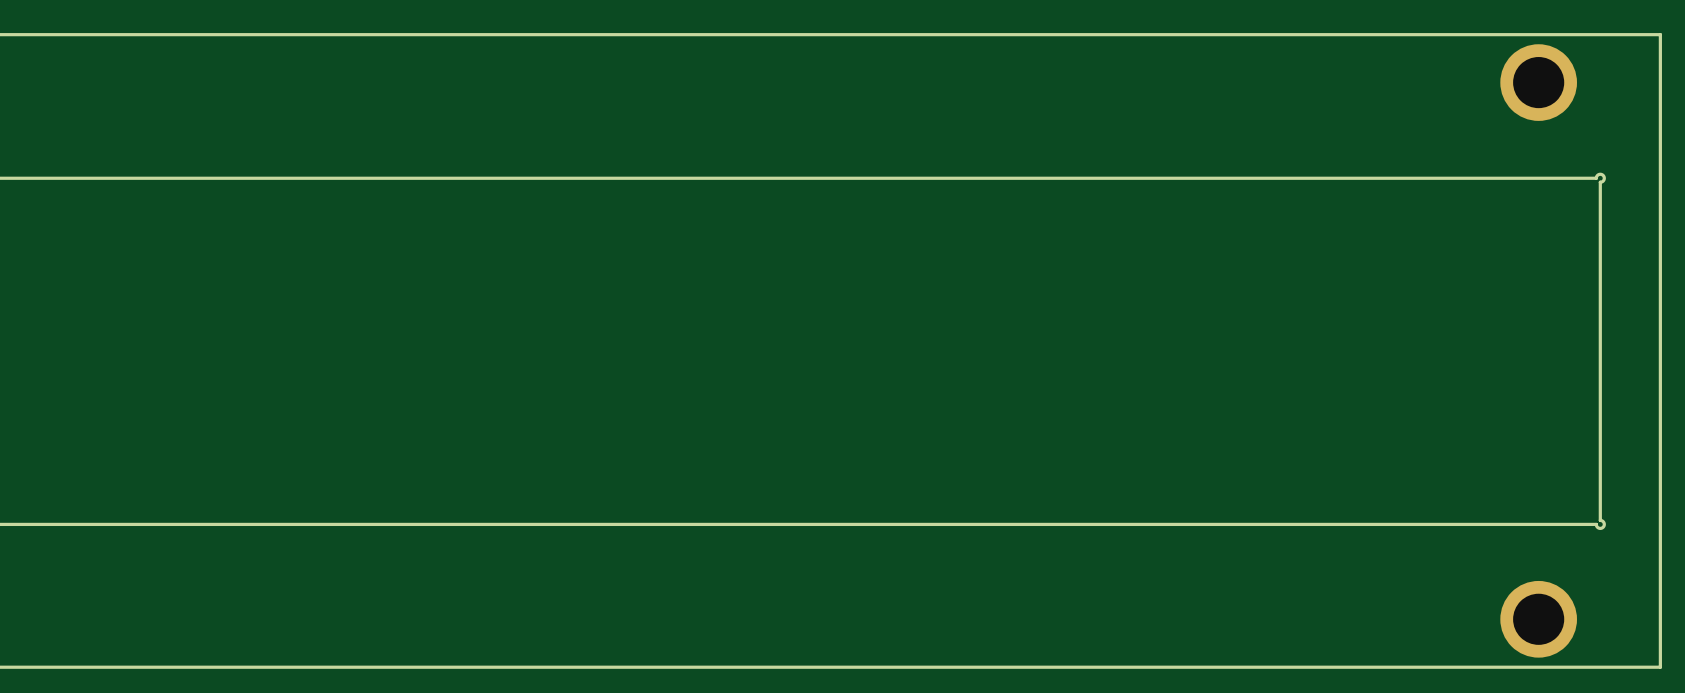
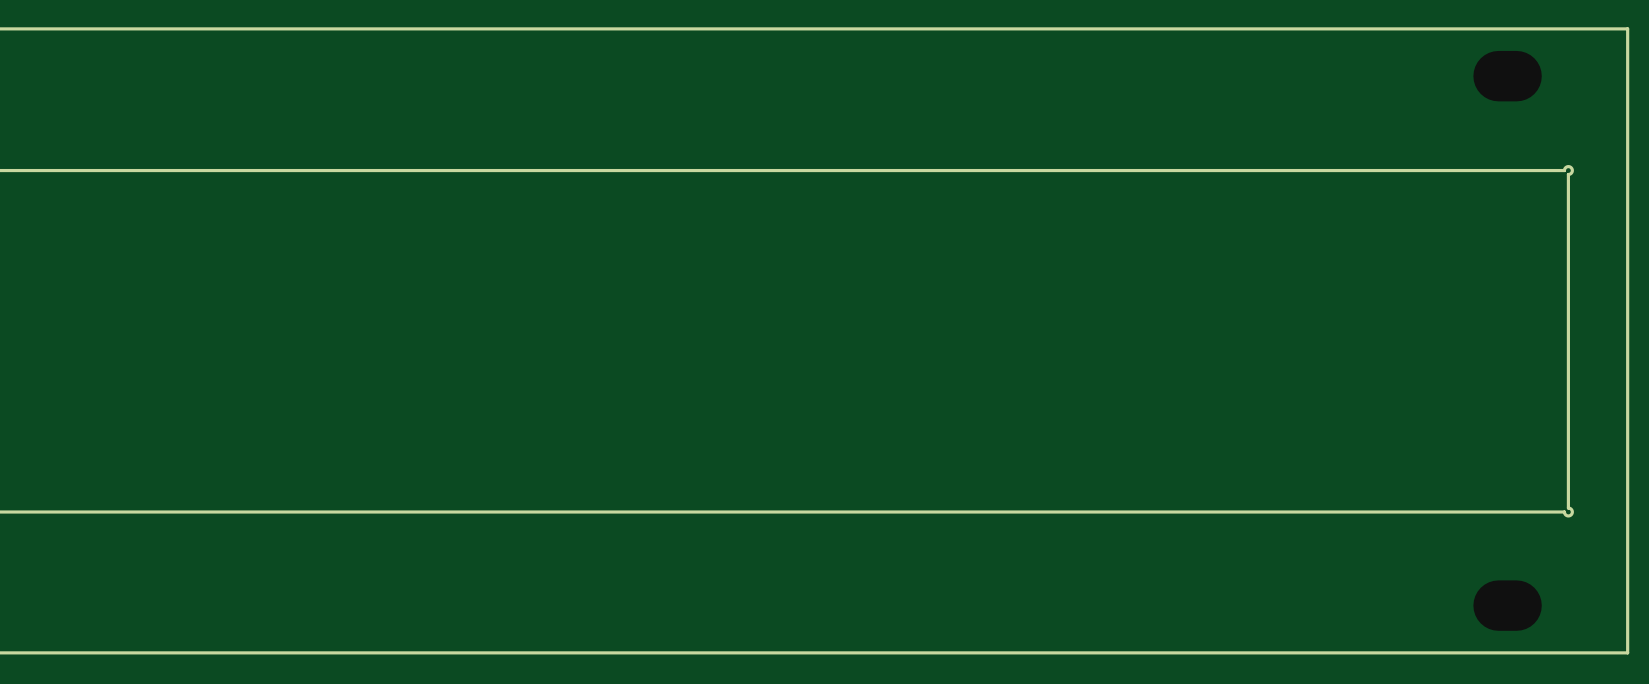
part footprint: [1500, 44, 1577, 121] -> [1473, 50, 1542, 102]
part footprint: [1500, 580, 1577, 658] -> [1473, 580, 1542, 631]

